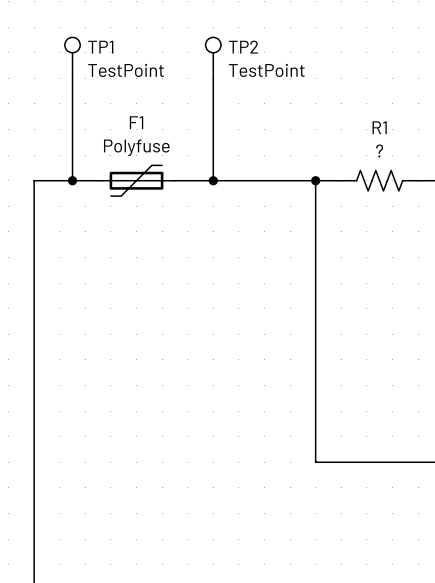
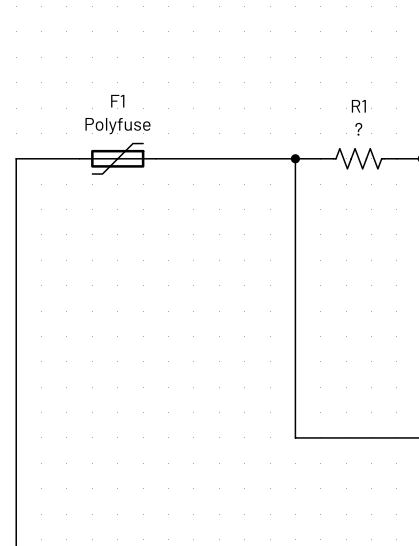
TP1: TestPoint (72, 57) -> none
TP2: TestPoint (213, 57) -> none
wire: (72, 78) (72, 180) -> none
wire: (213, 78) (213, 180) -> none
junction: (72, 180) -> none
junction: (213, 180) -> none

